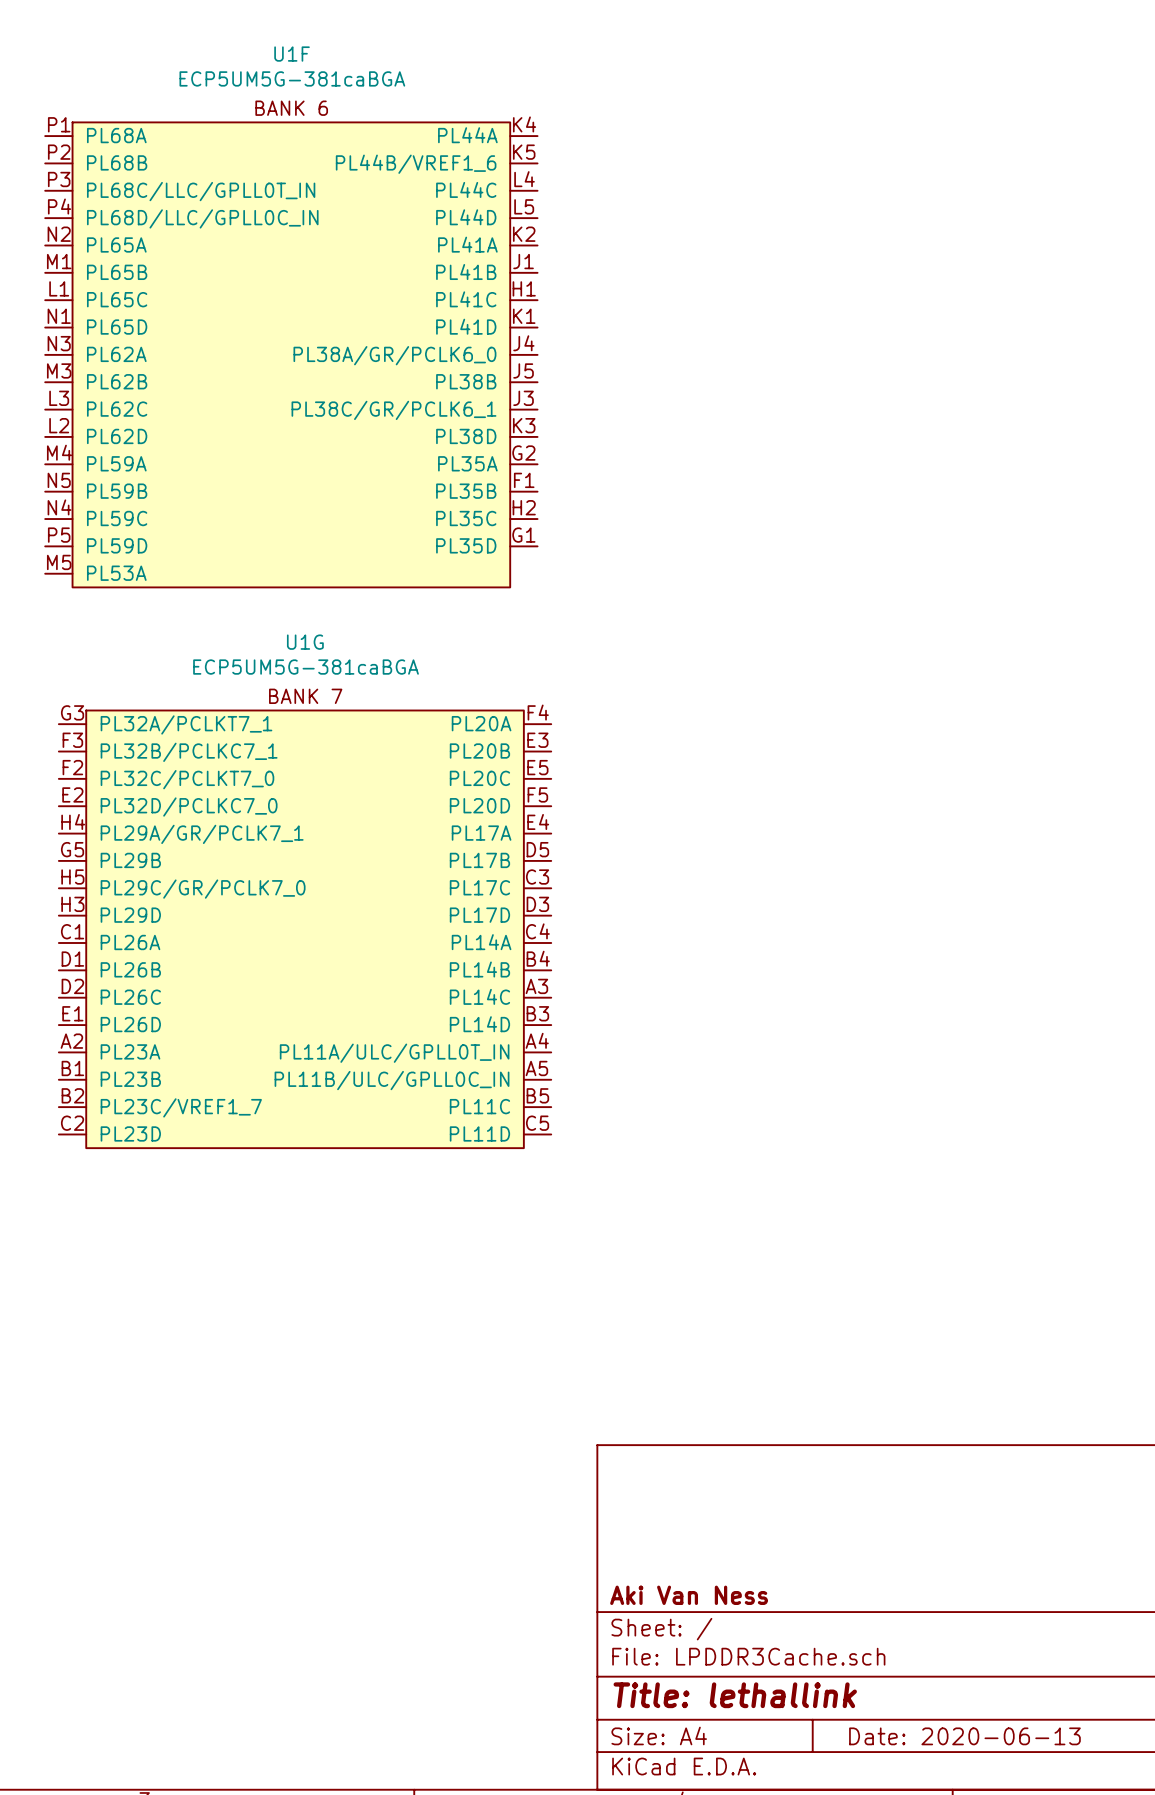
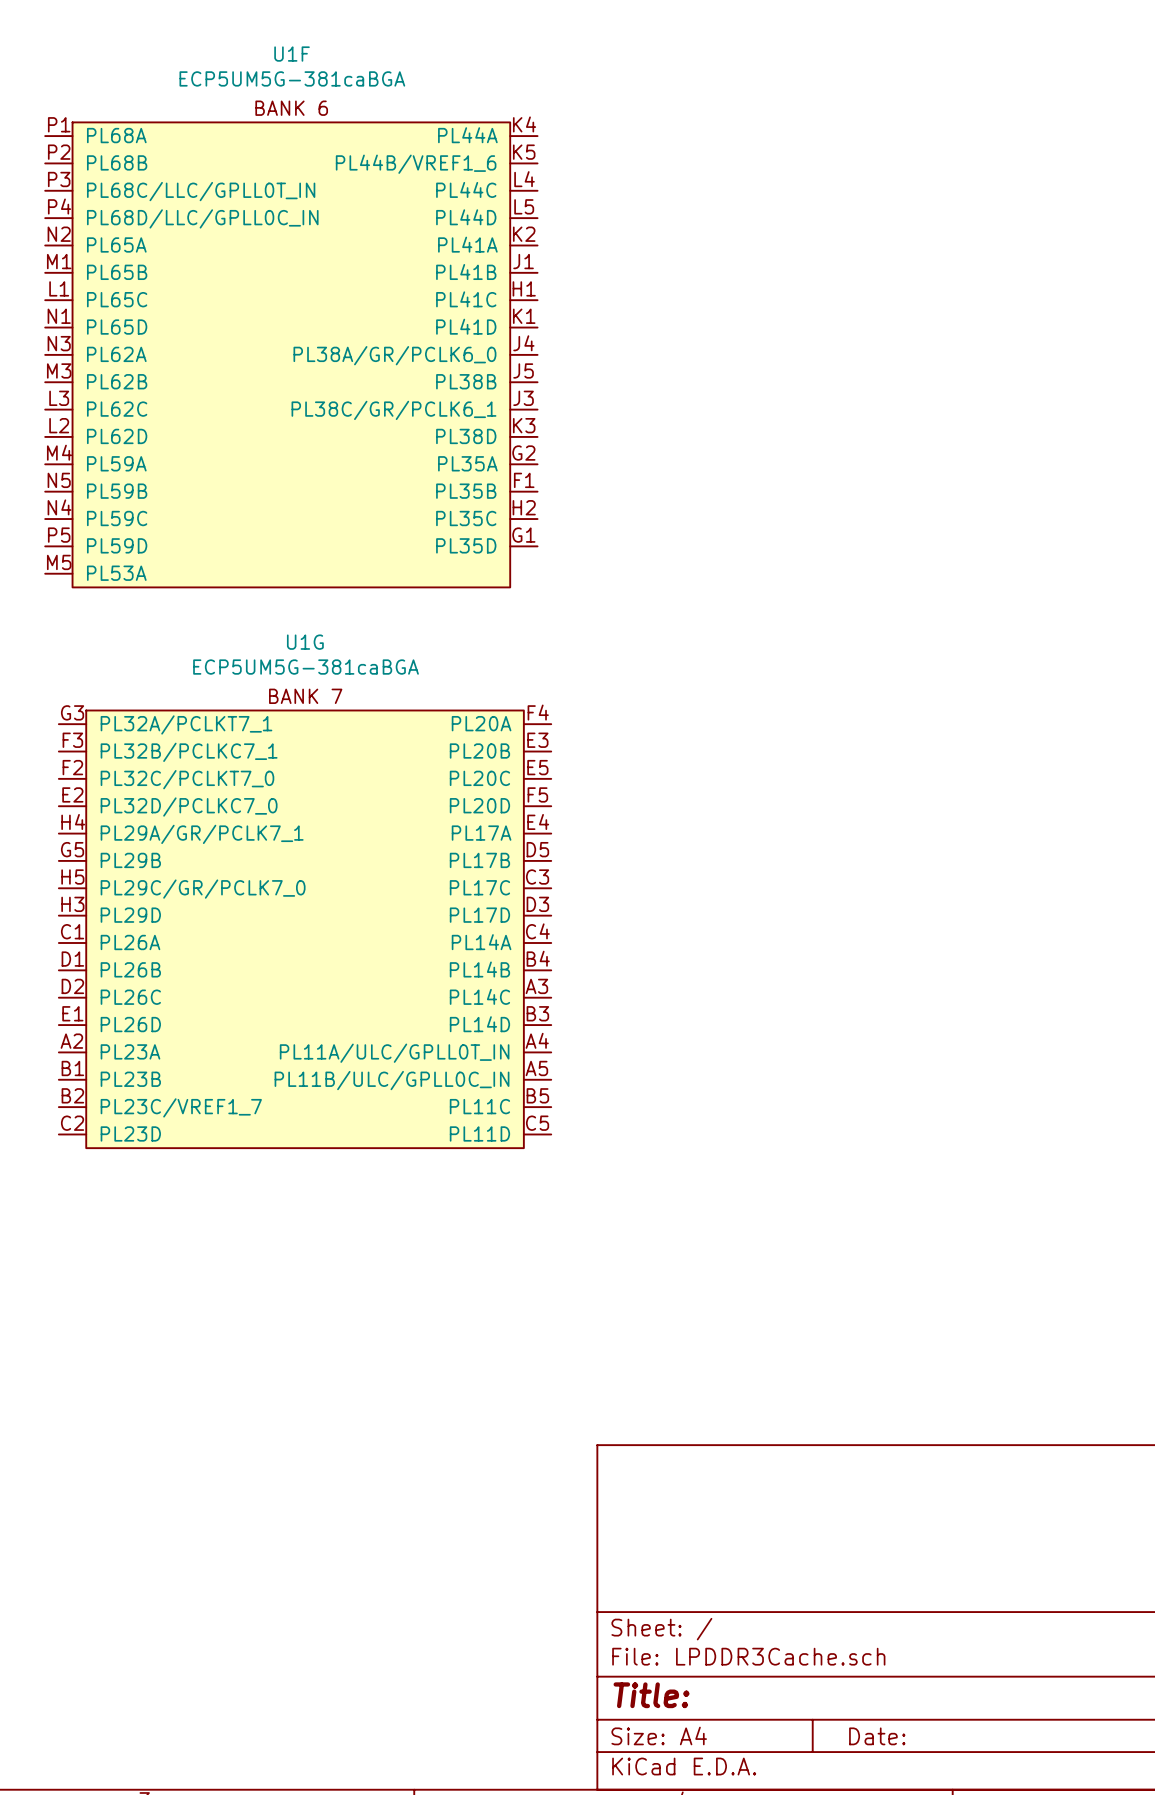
title block: Aki Van Ness (689, 1595) -> none
title block: Title: lethallink (735, 1695) -> Title: (651, 1695)
title block: Date: 2020-06-13 (964, 1736) -> Date: (877, 1736)

